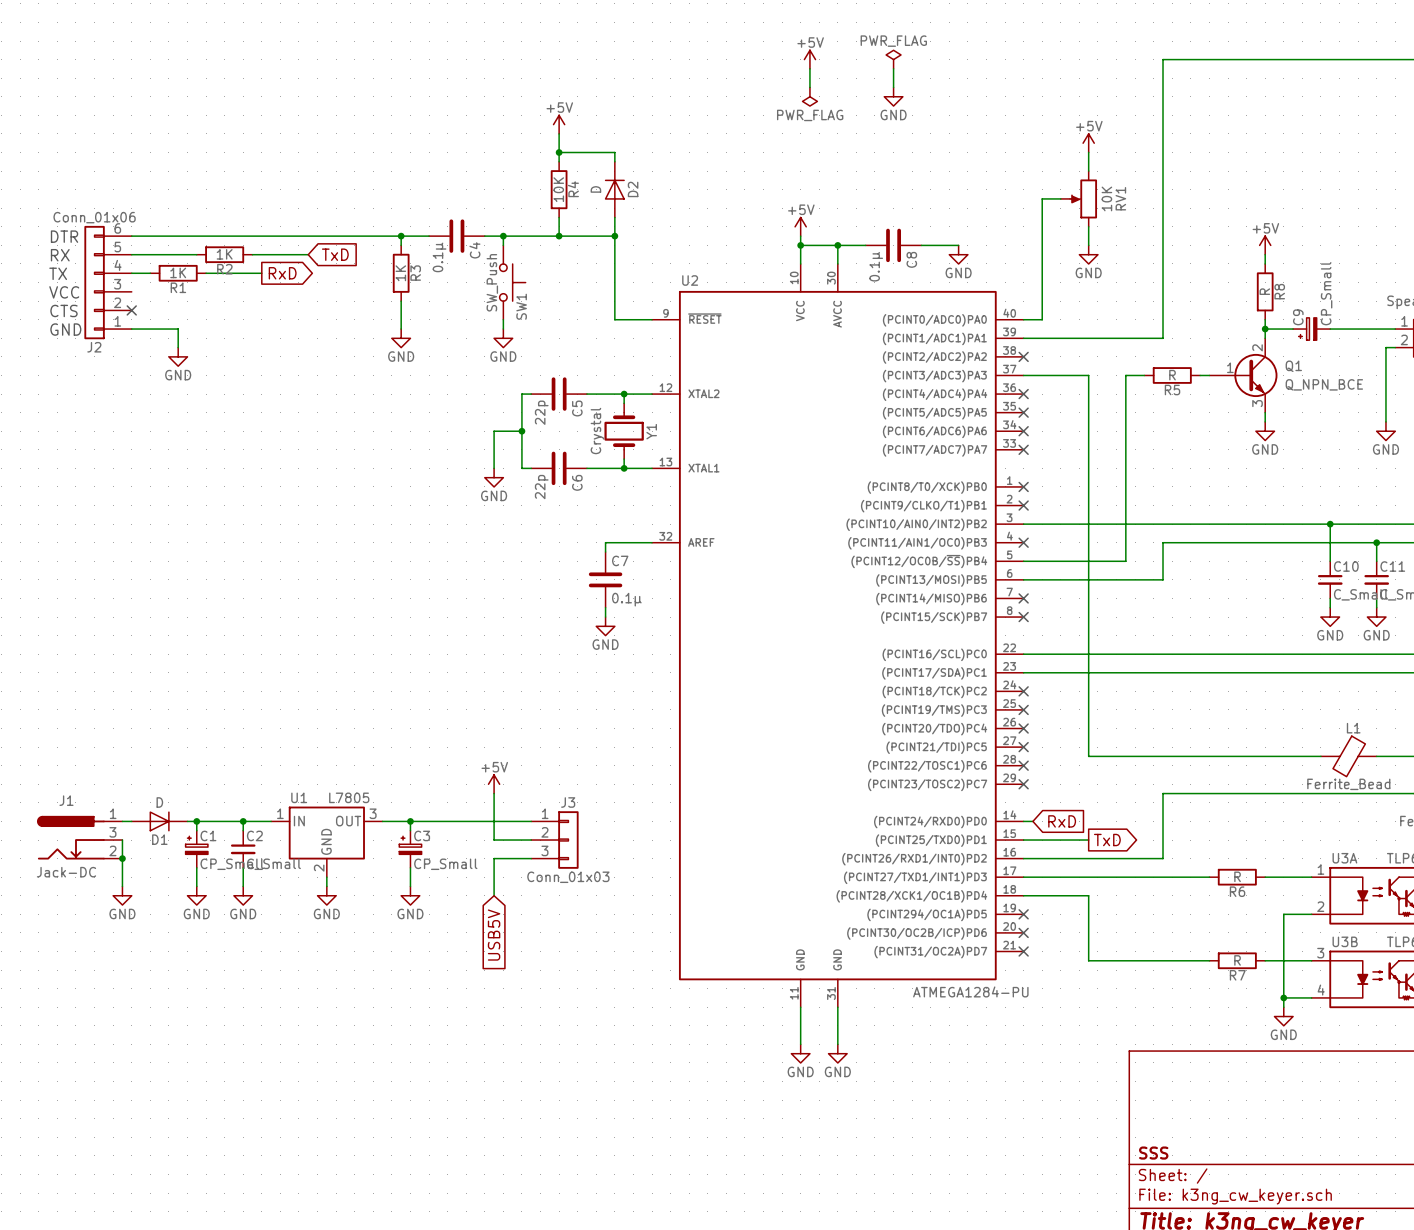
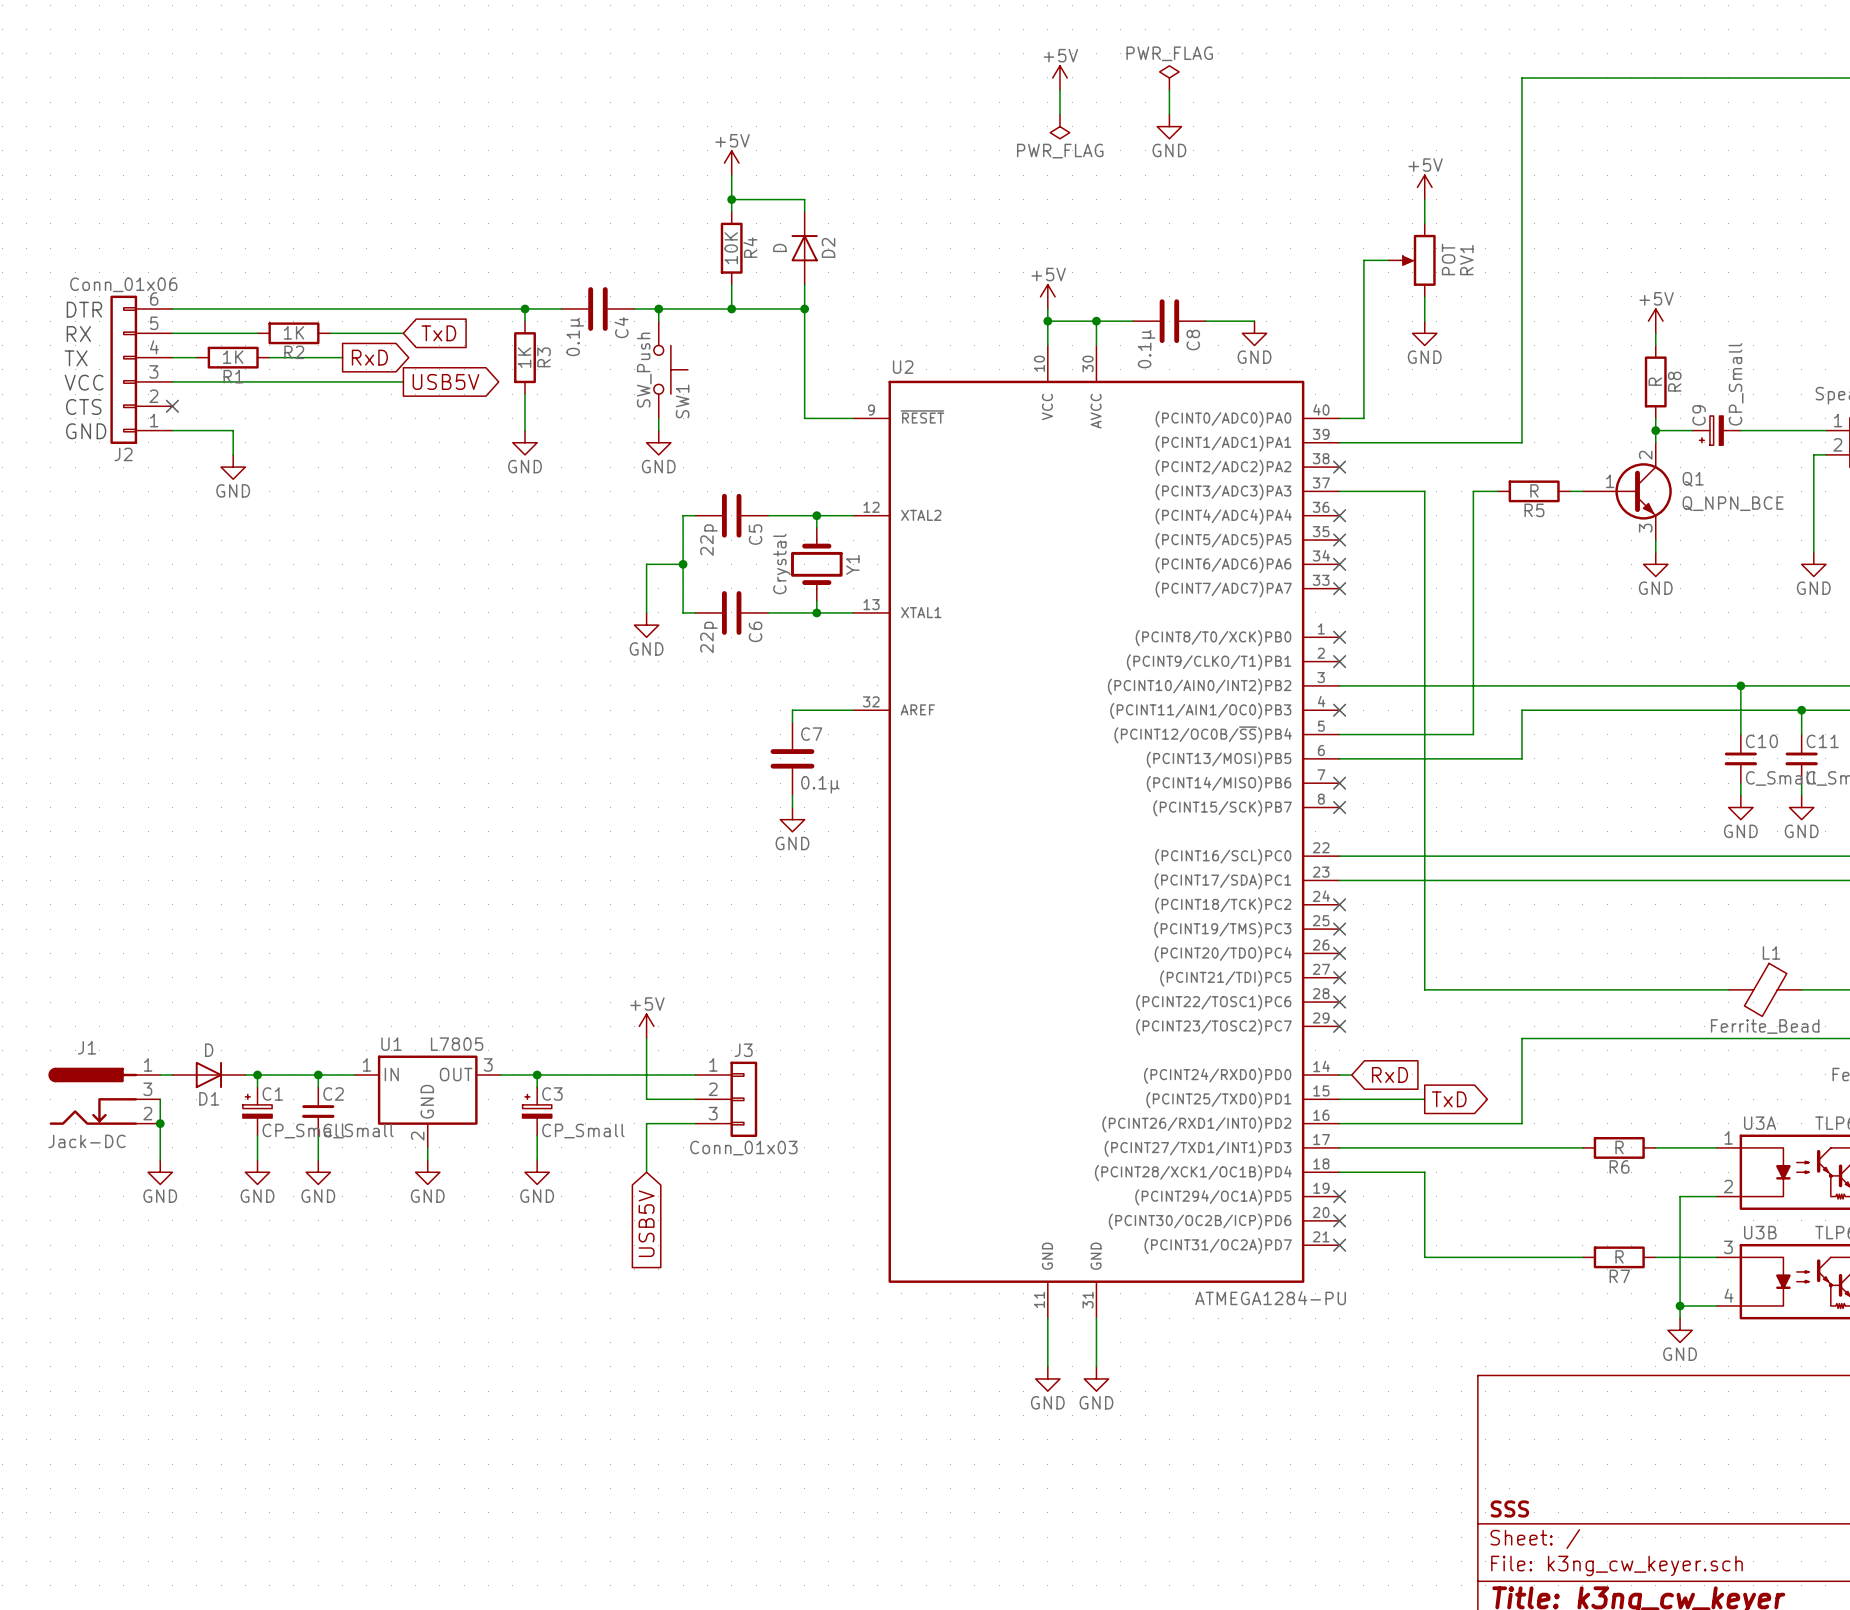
RV1 value: 10K (1106, 198) -> POT (1448, 259)
wire: none -> (172, 381) (403, 381)
global label: none -> USB5V (445, 381)

